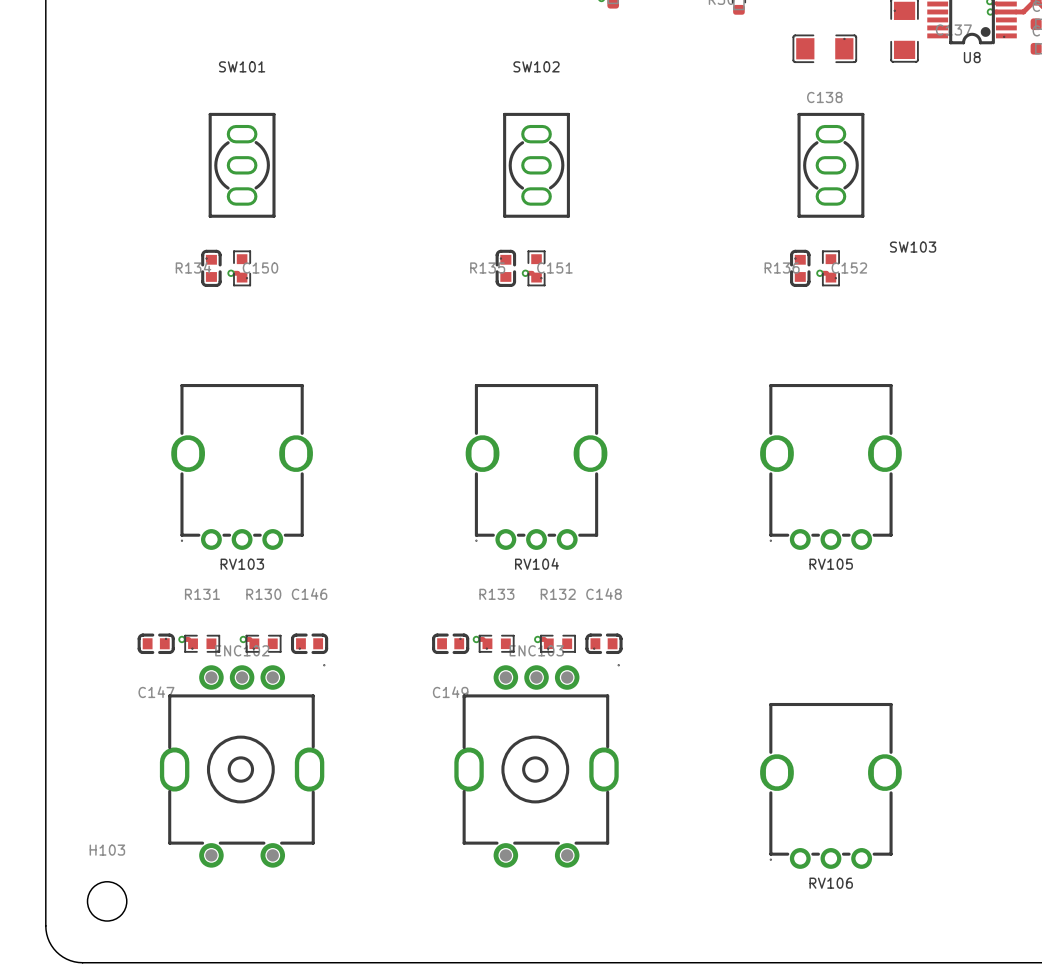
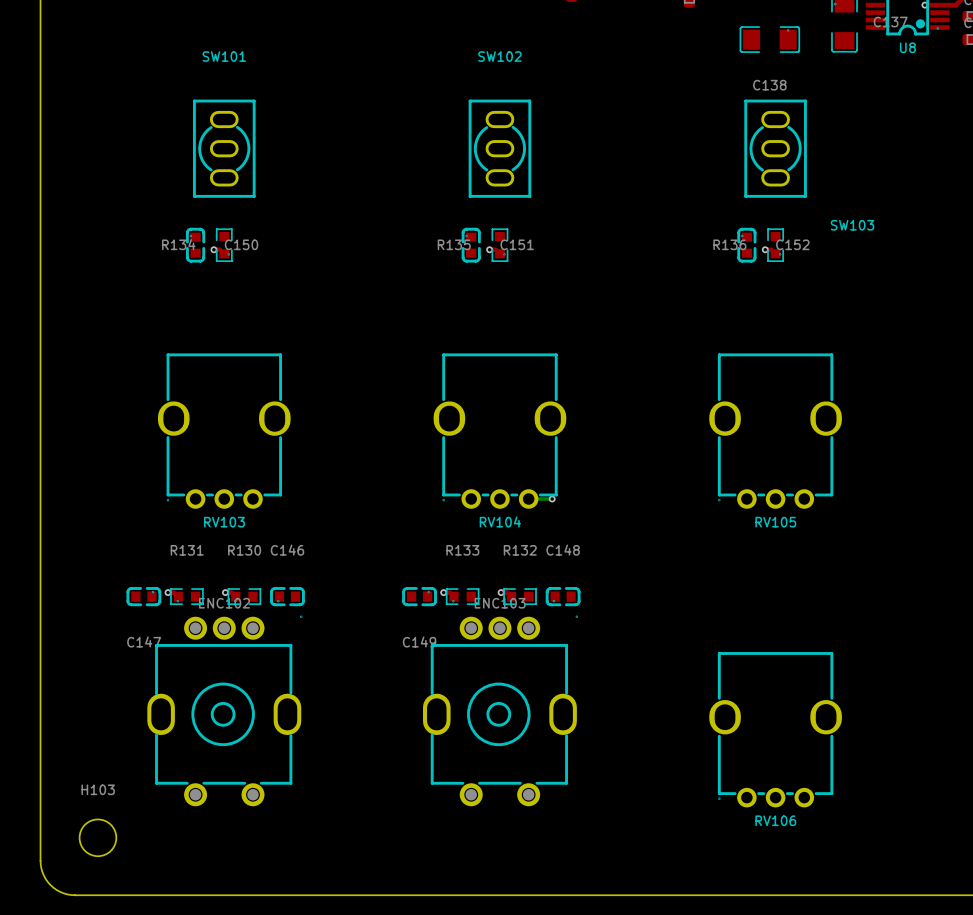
bottom track: none -> (528, 498) (552, 498)
via: none -> (552, 498)

